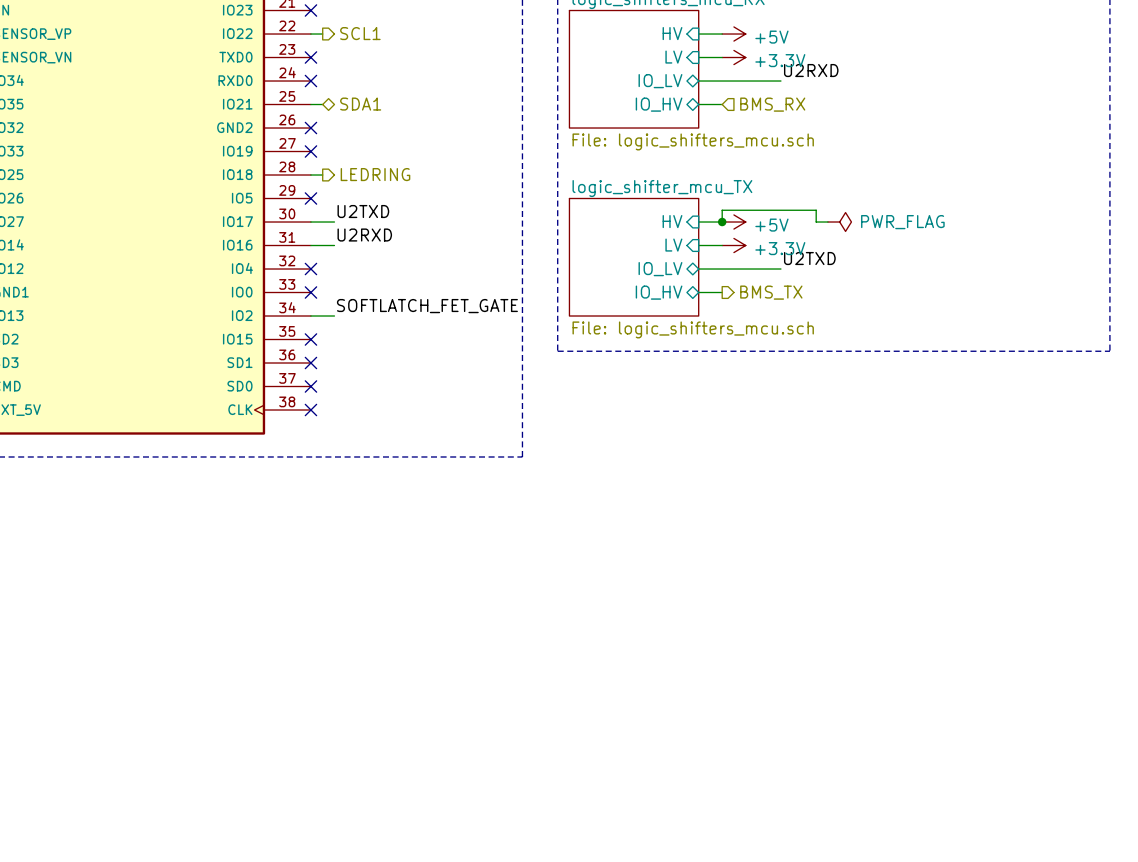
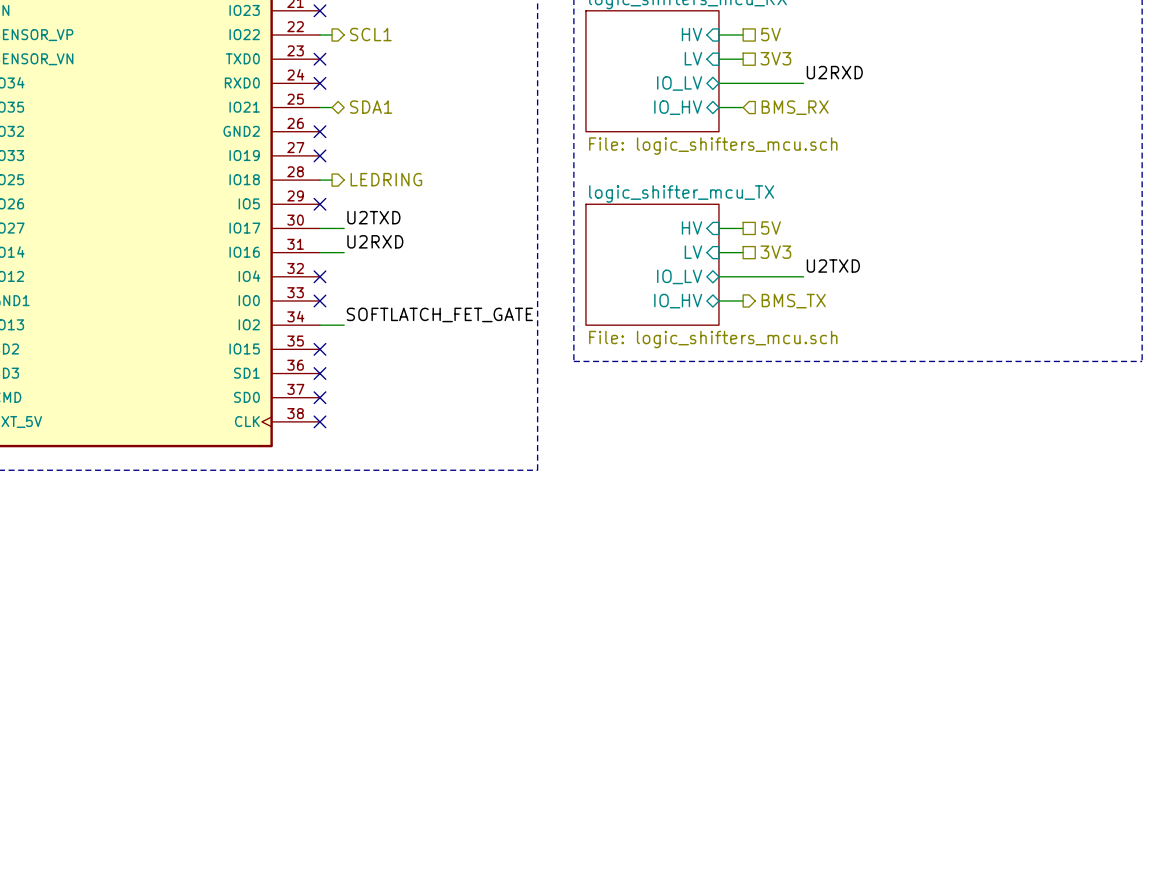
hierarchical label: none -> 5V (770, 34)
power symbol: +5V (733, 34) -> none
power symbol: +3.3V (733, 57) -> none
hierarchical label: none -> 3V3 (775, 58)
hierarchical label: none -> 5V (770, 227)
wire: (722, 222) (722, 210) (816, 210) (816, 222) (827, 222) -> none
junction: (722, 222) -> none
power symbol: +5V (733, 222) -> none
power symbol: PWR_FLAG (839, 222) -> none
power symbol: +3.3V (733, 245) -> none
hierarchical label: none -> 3V3 (775, 252)

